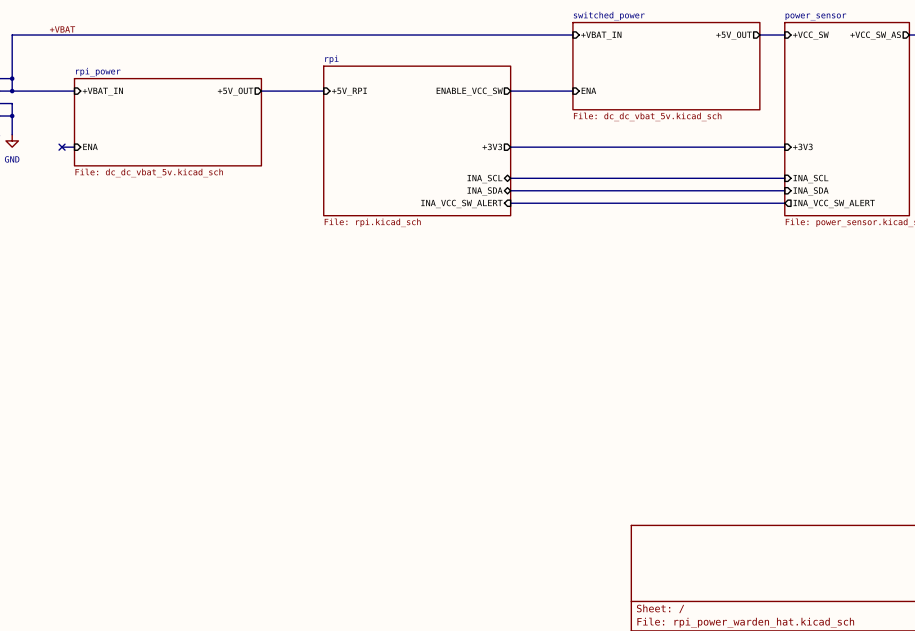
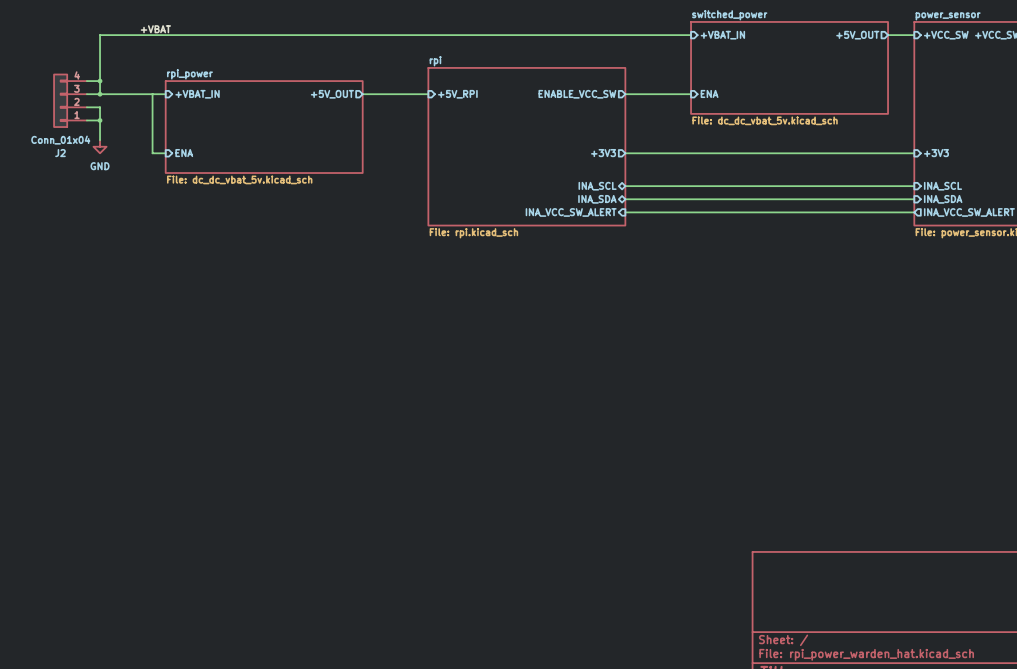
wire: none -> (152, 94) (152, 153)
no-connect mark: (62, 147) -> none

